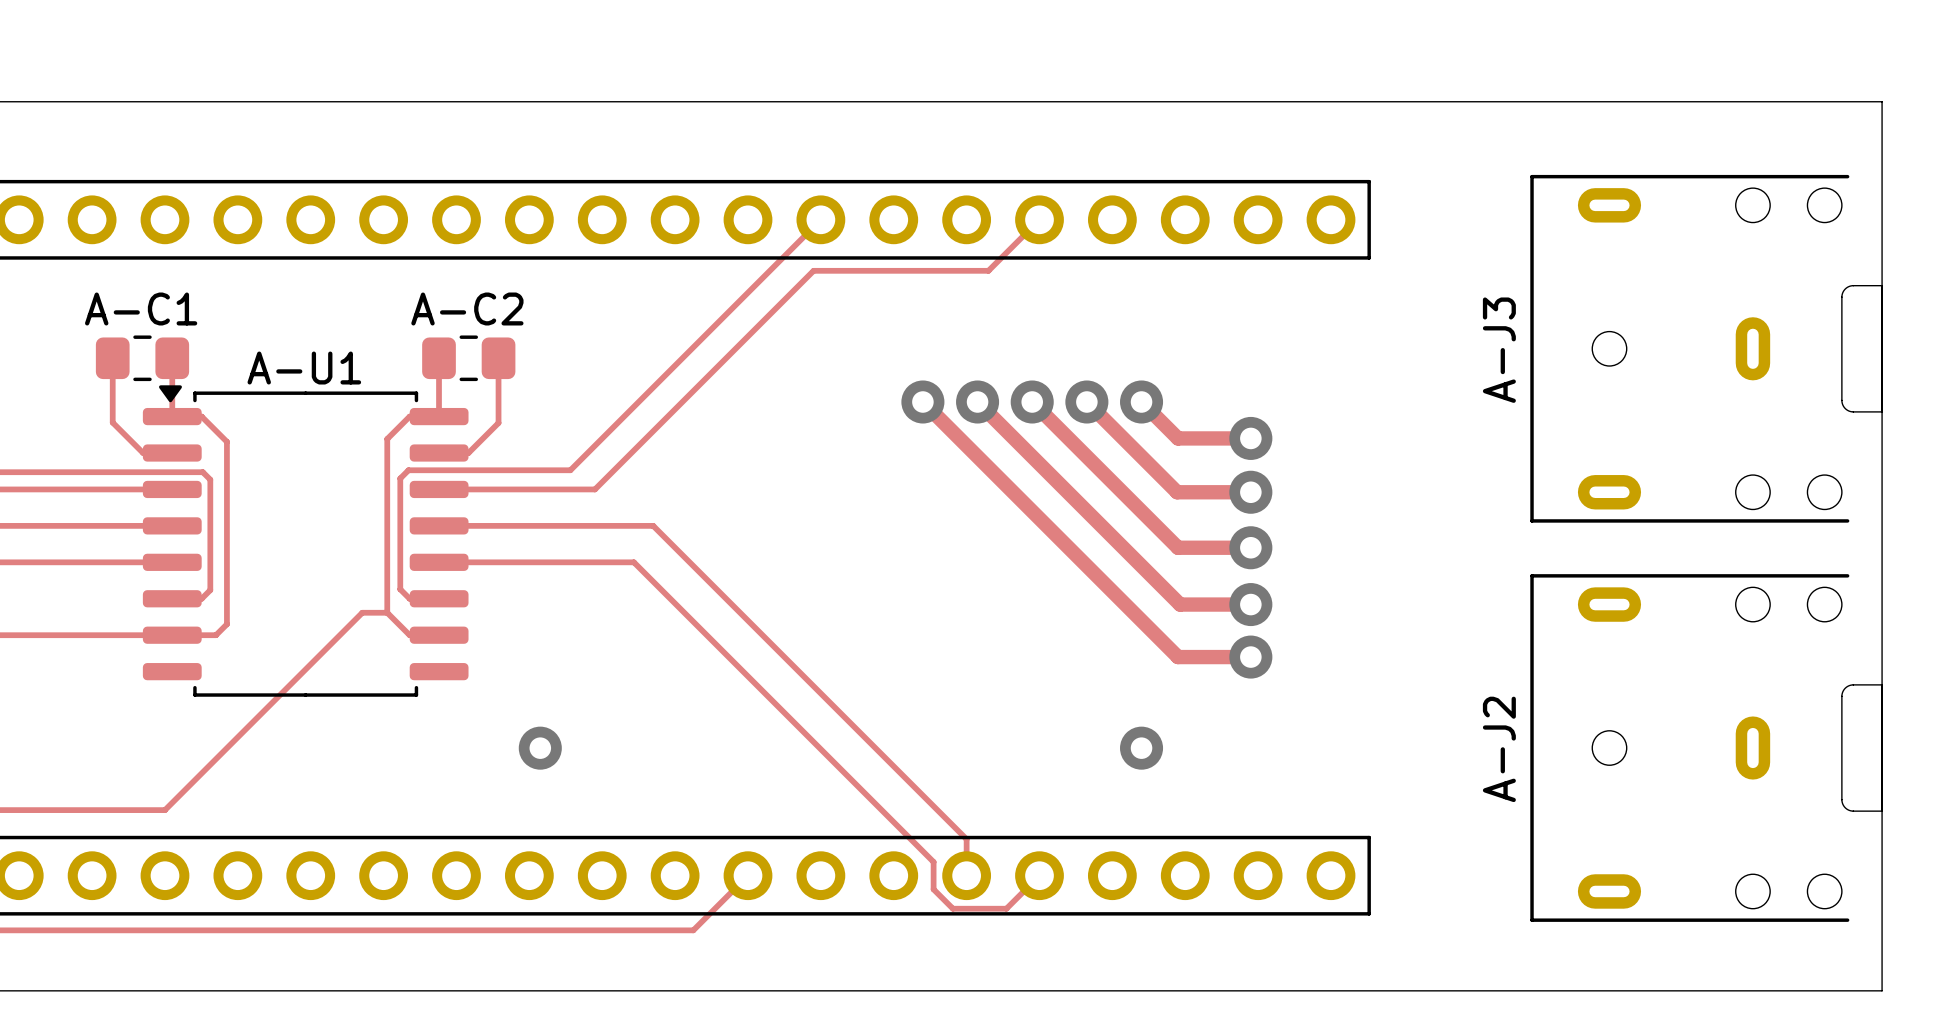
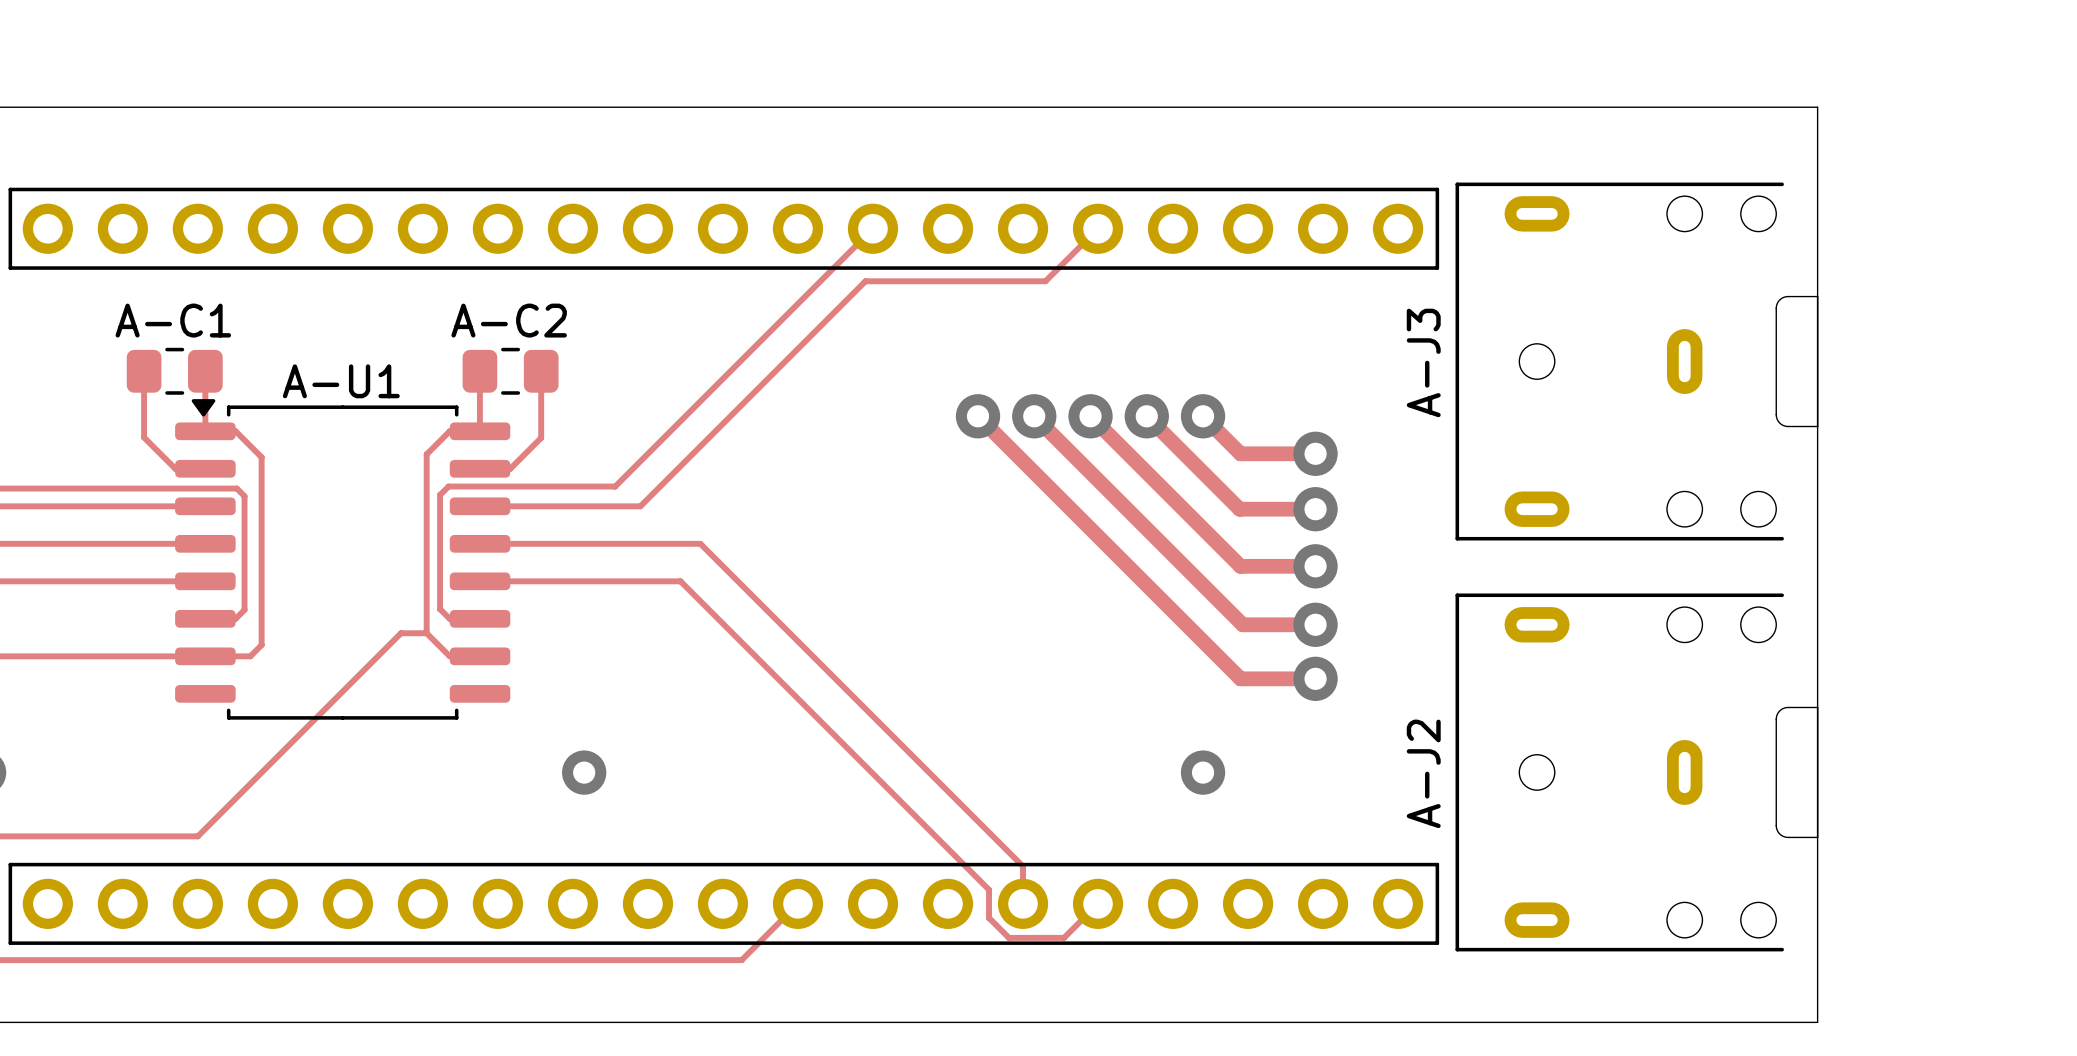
board edge: (1738, 101) (1882, 101) (1882, 990) (1738, 990) -> (1817, 107) (1817, 1022)
A-J3 position: (1706, 348) -> (1636, 361)
A-J2 position: (1706, 748) -> (1636, 772)

